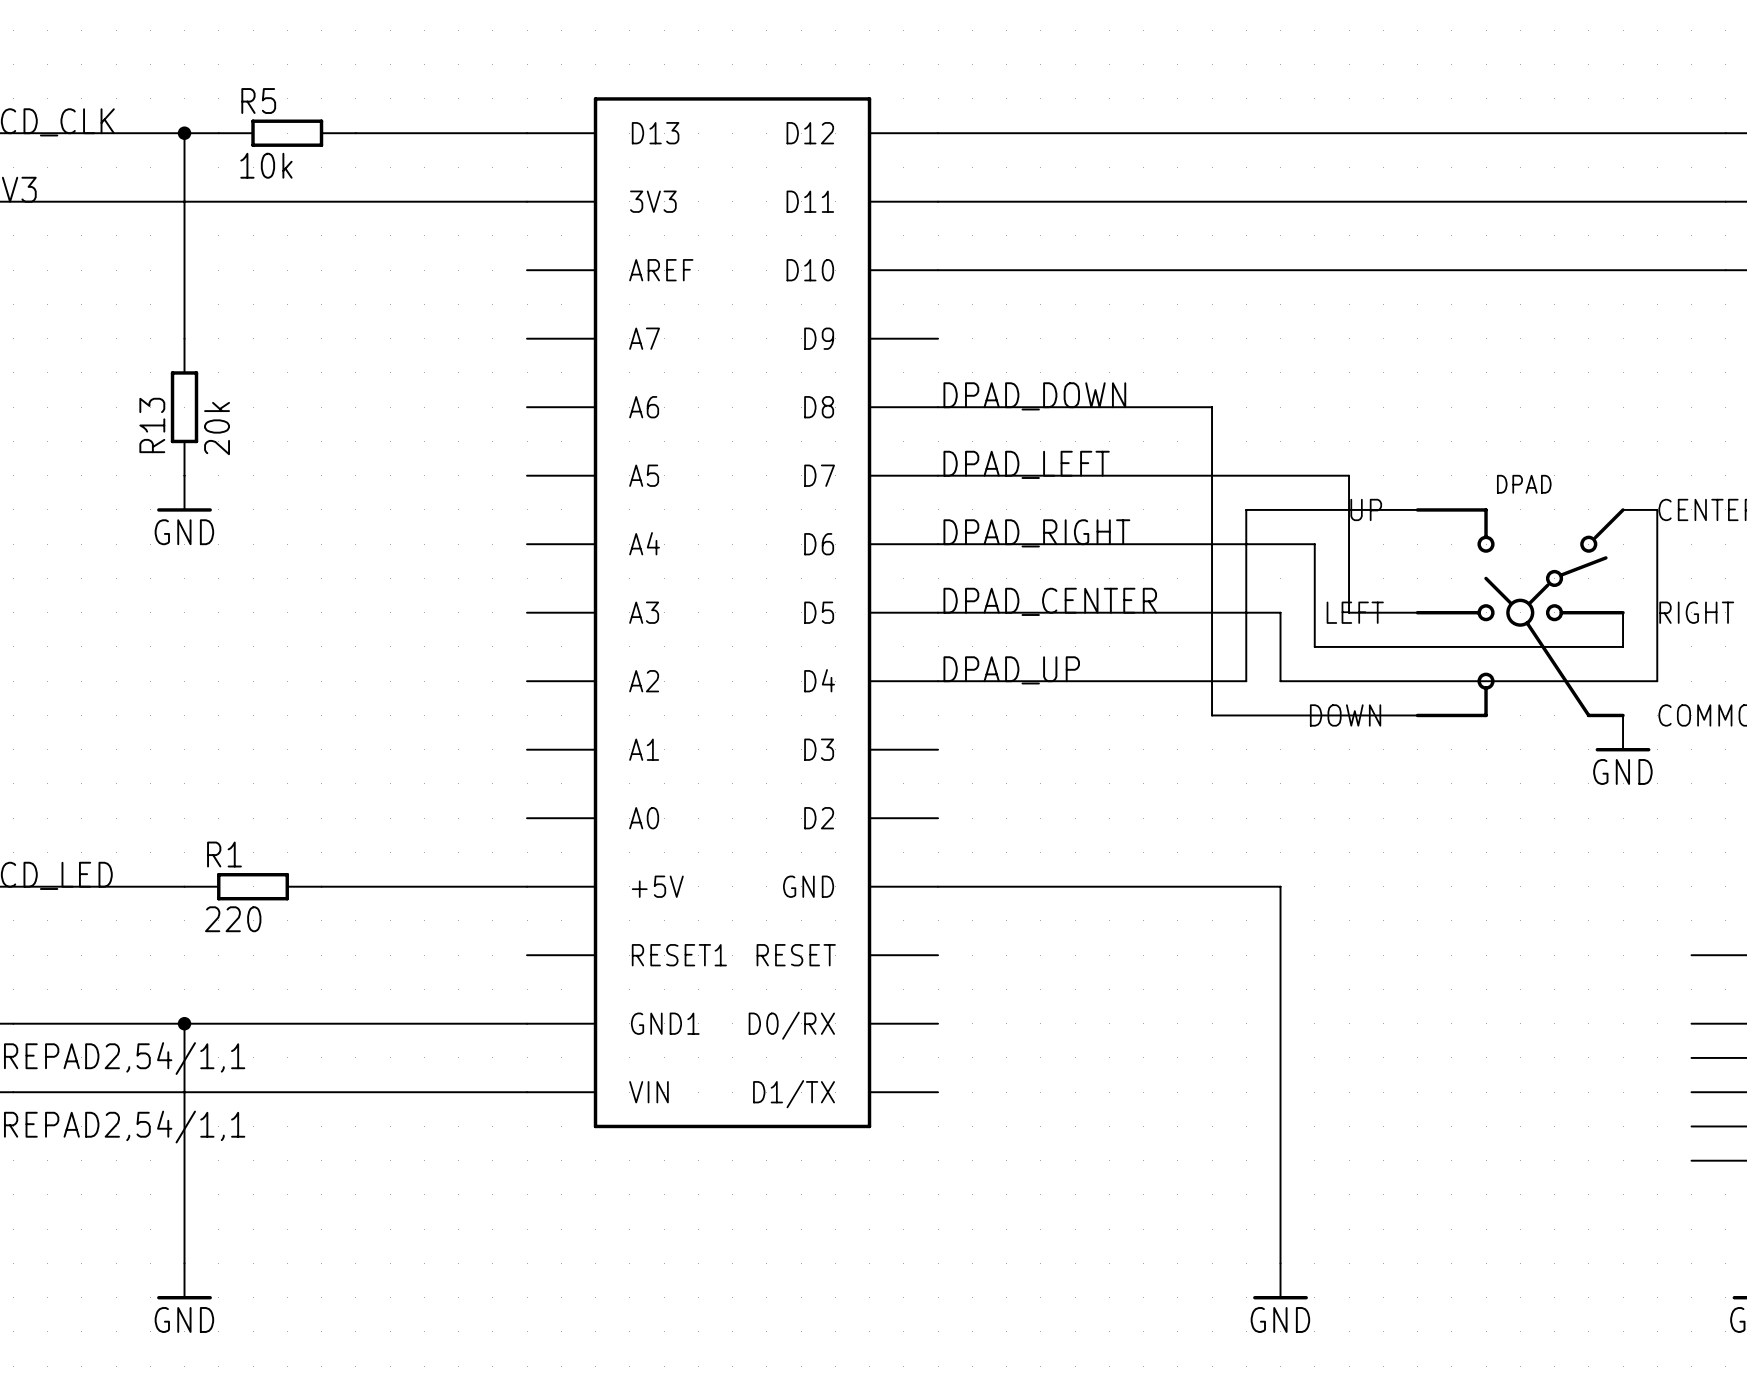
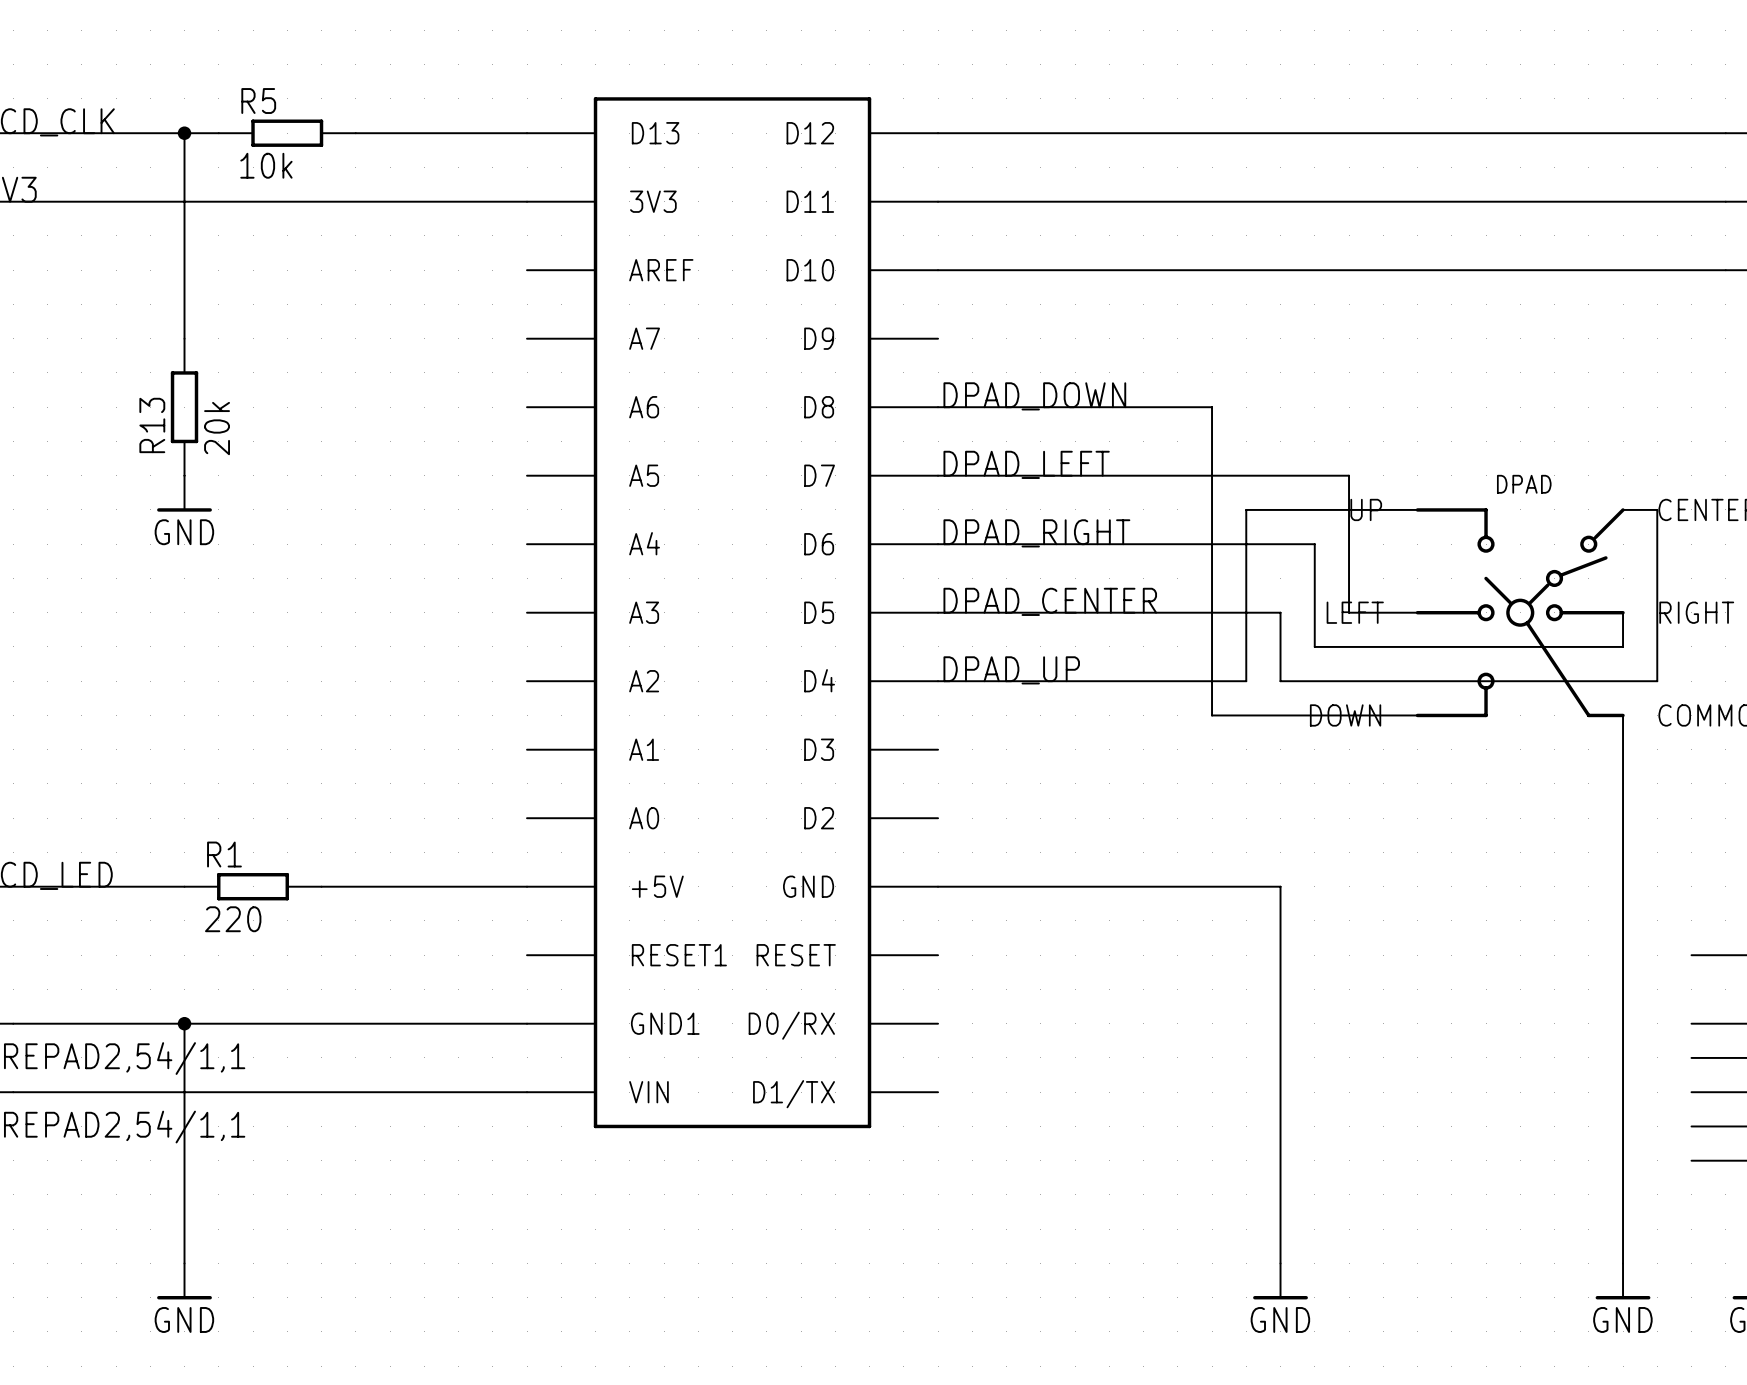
wire: none -> (1623, 715) (1623, 1263)
power symbol: GND (1623, 733) -> none
power symbol: none -> GND (1623, 1281)

